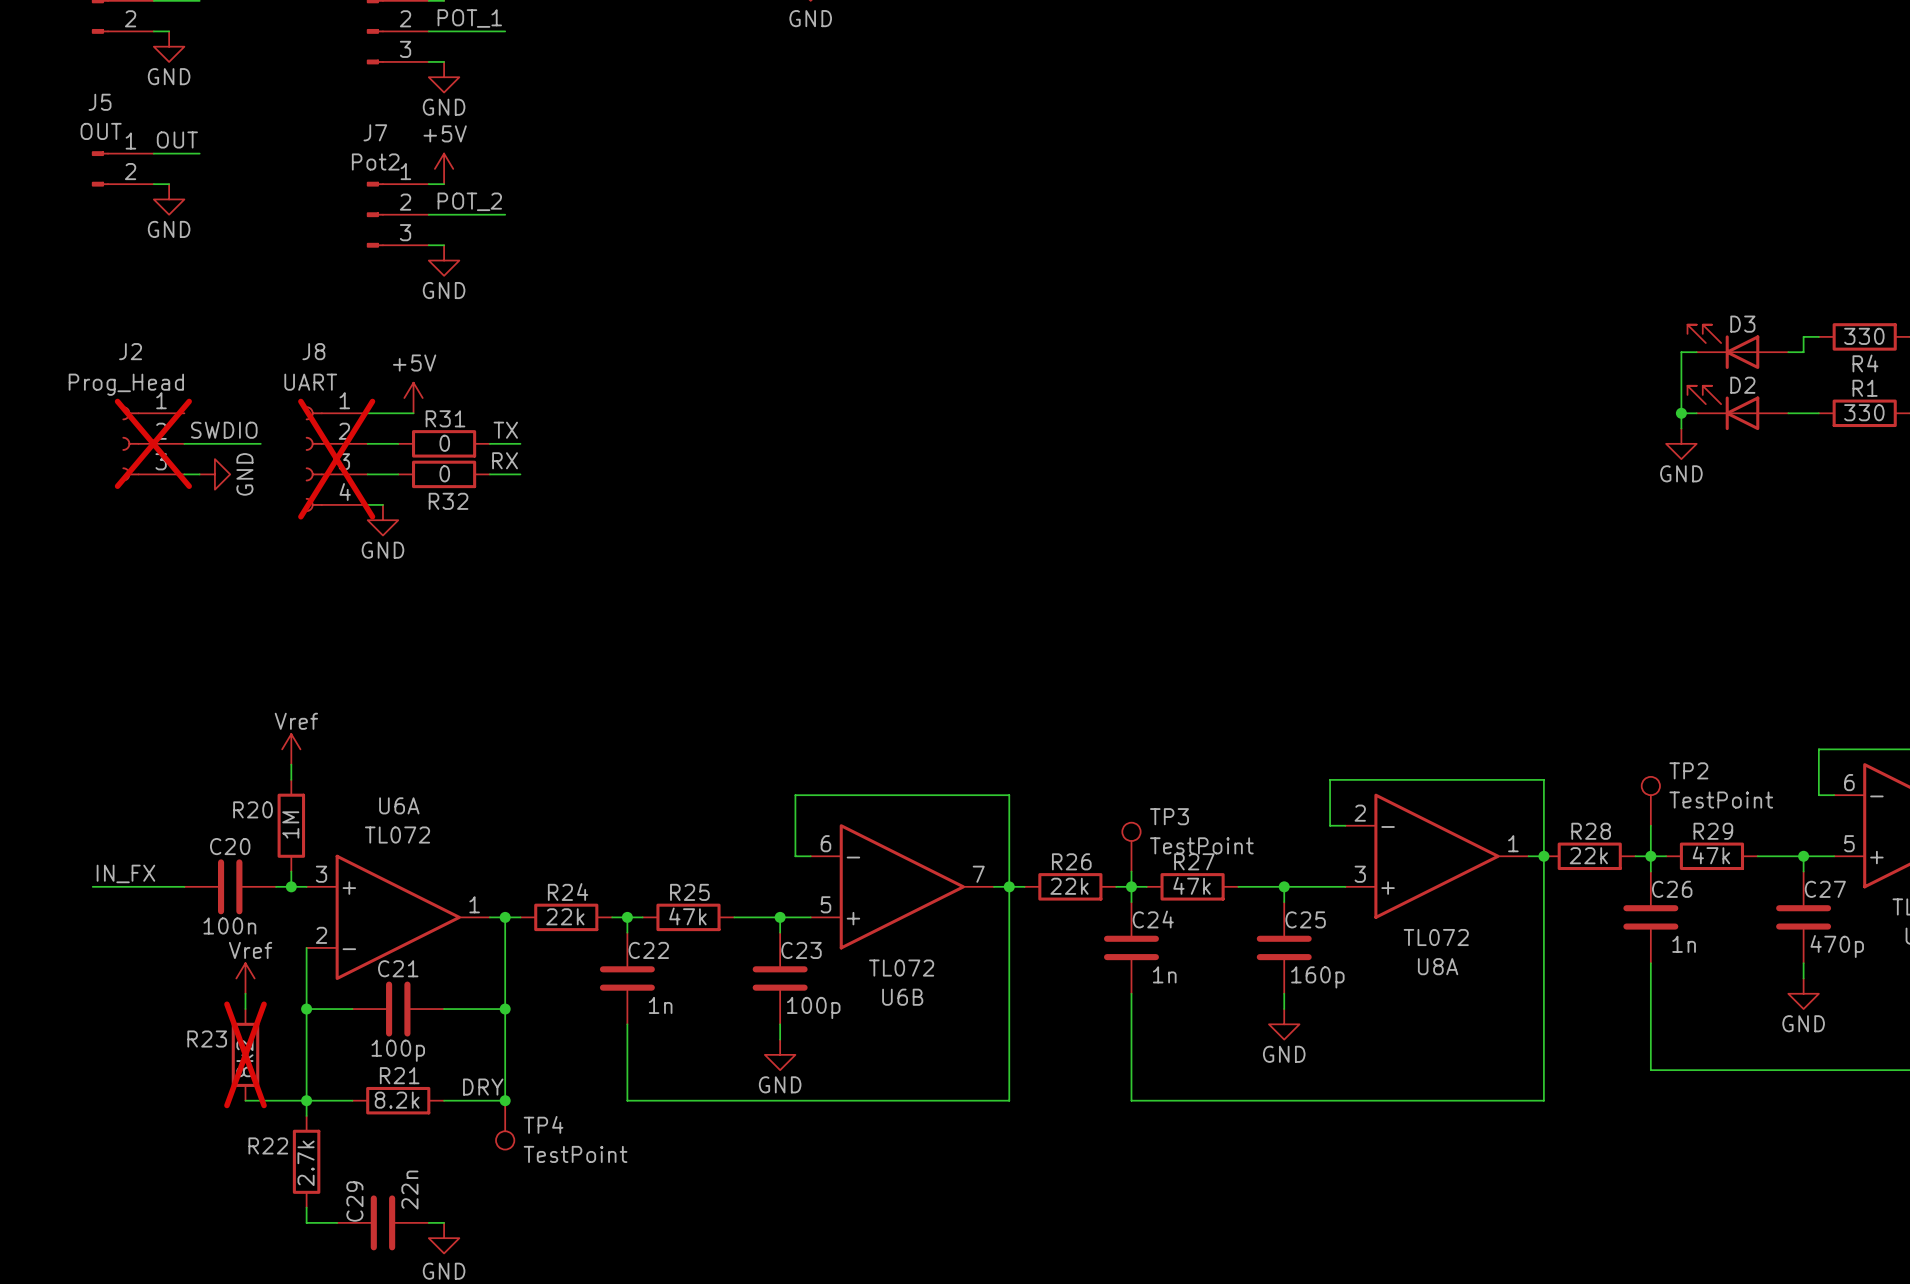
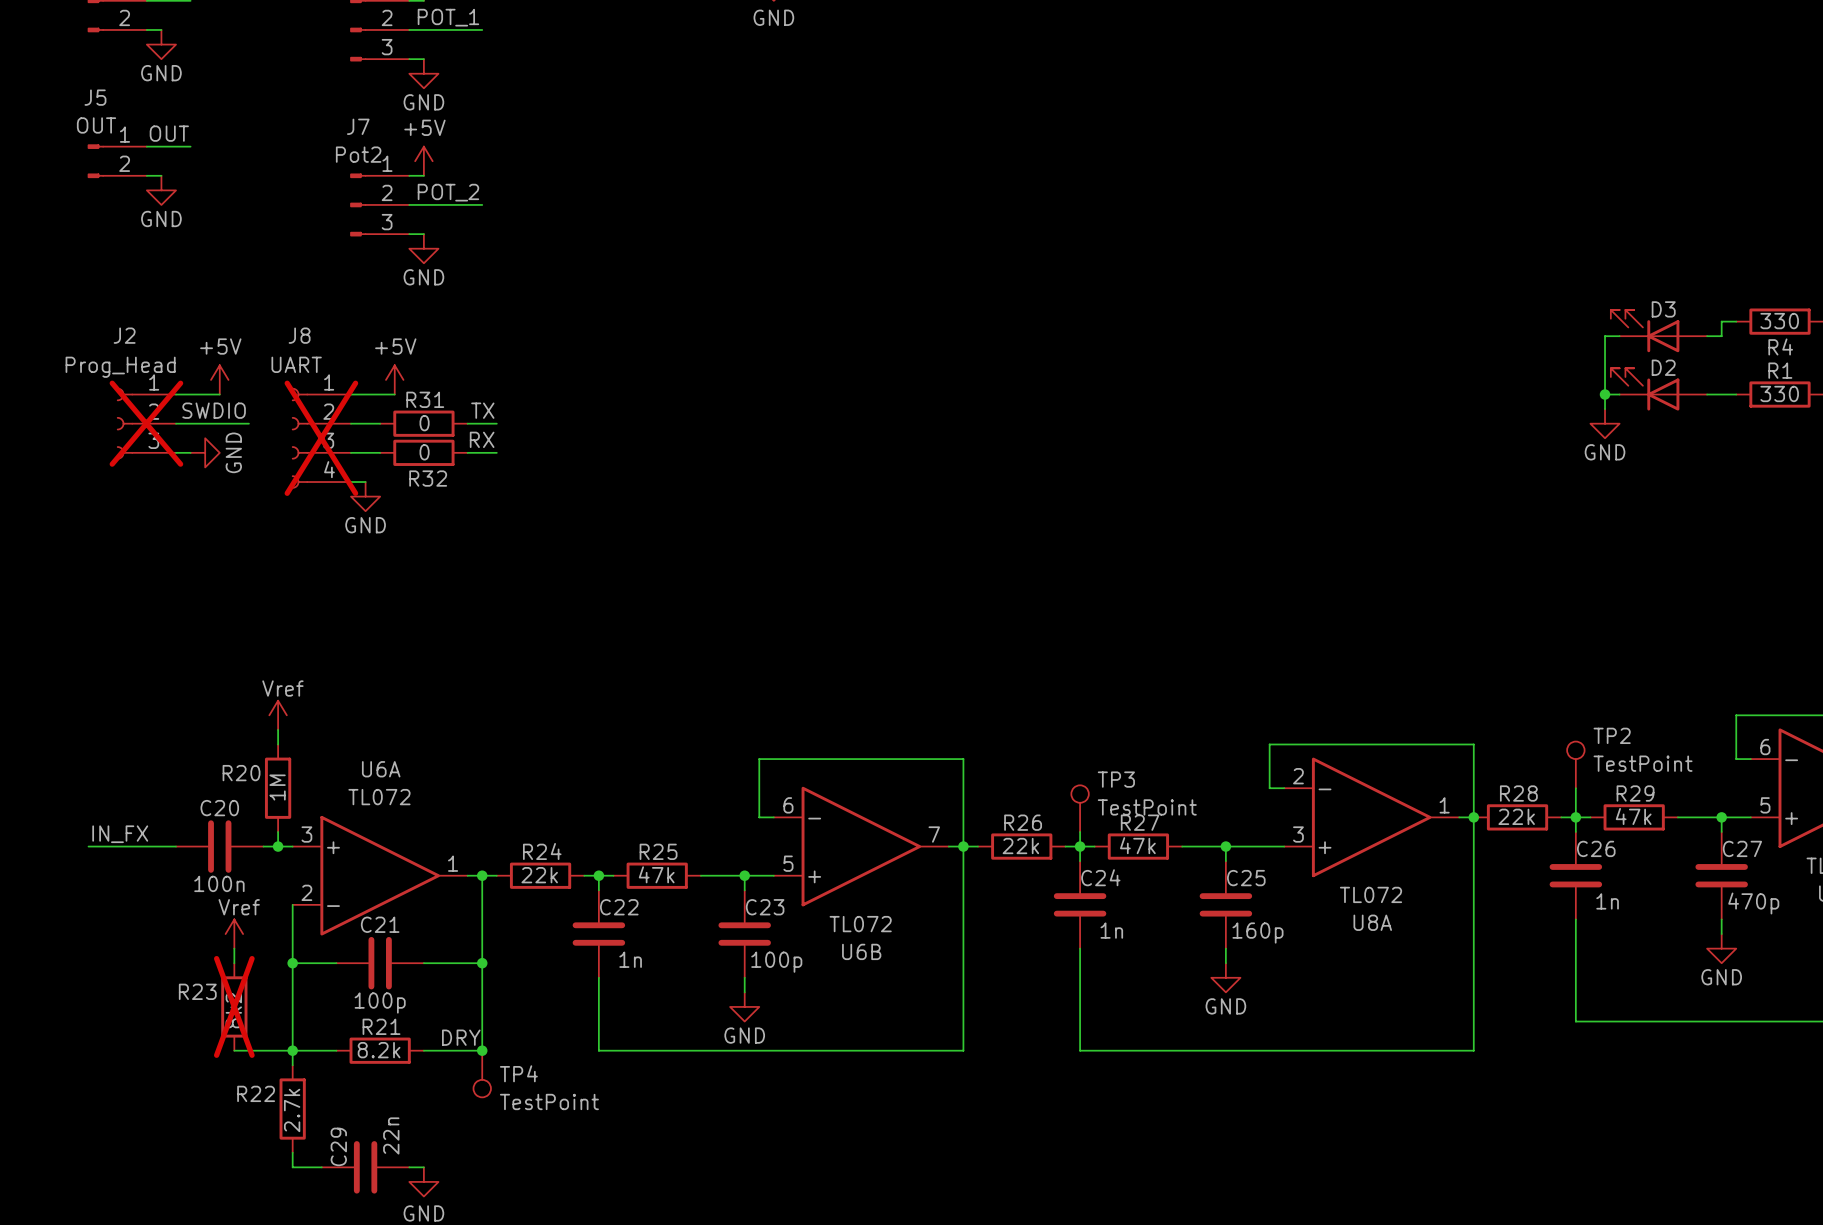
power symbol: none -> +5V (219, 379)
wire: none -> (176, 394) (219, 394)

